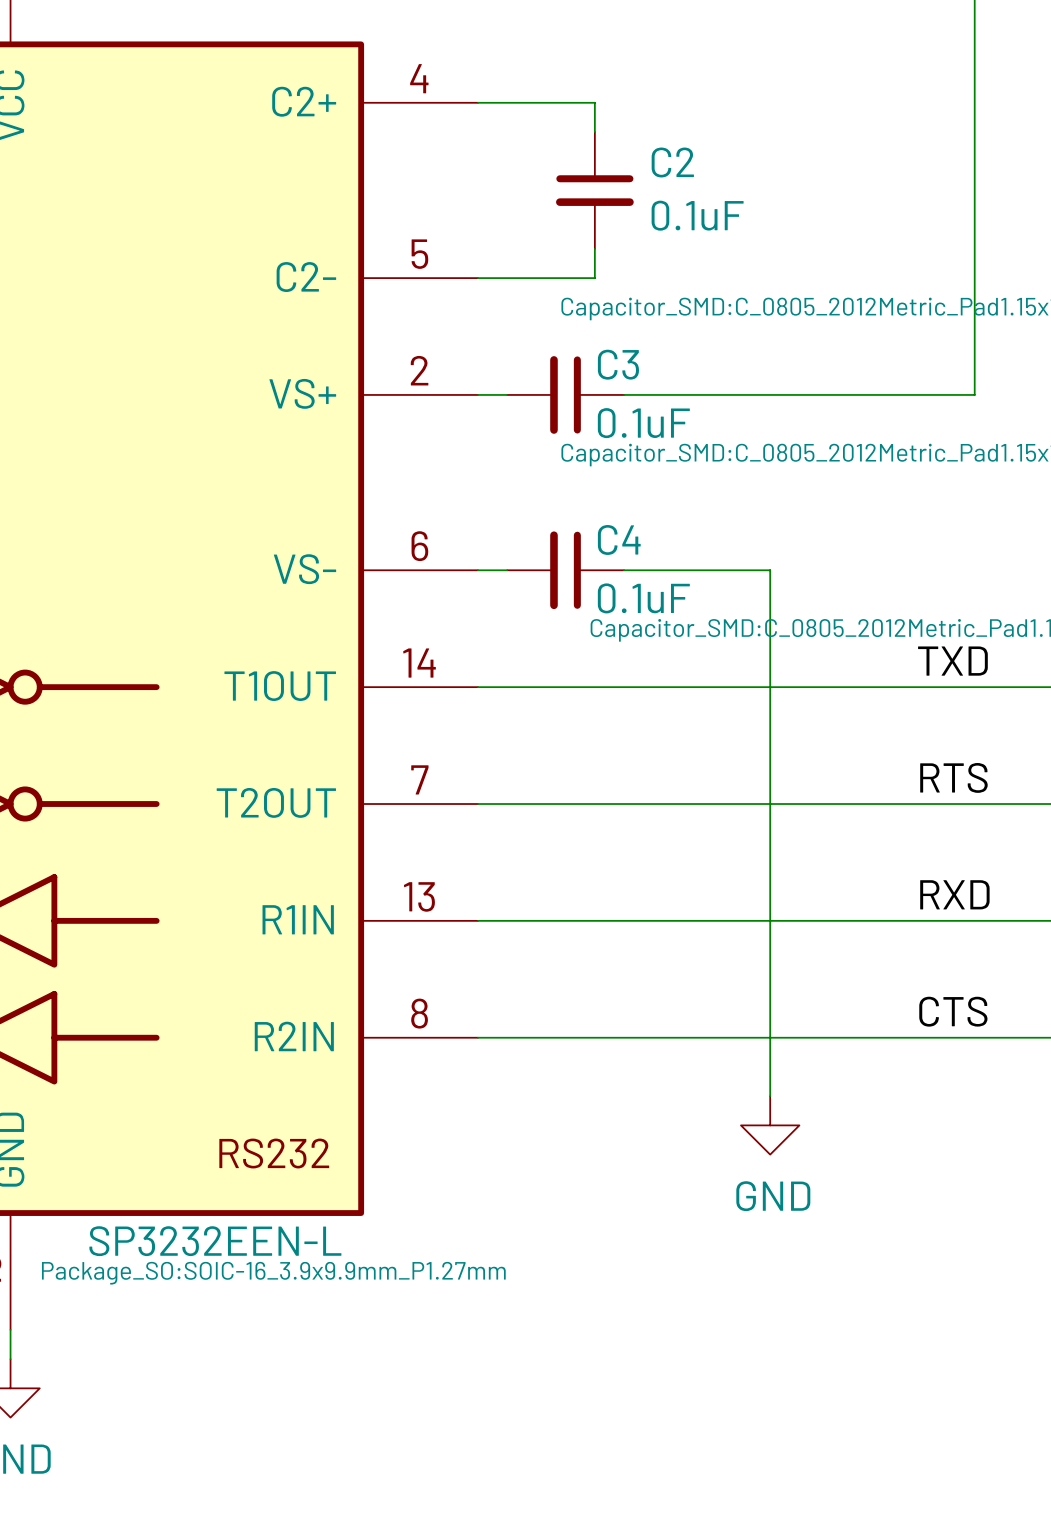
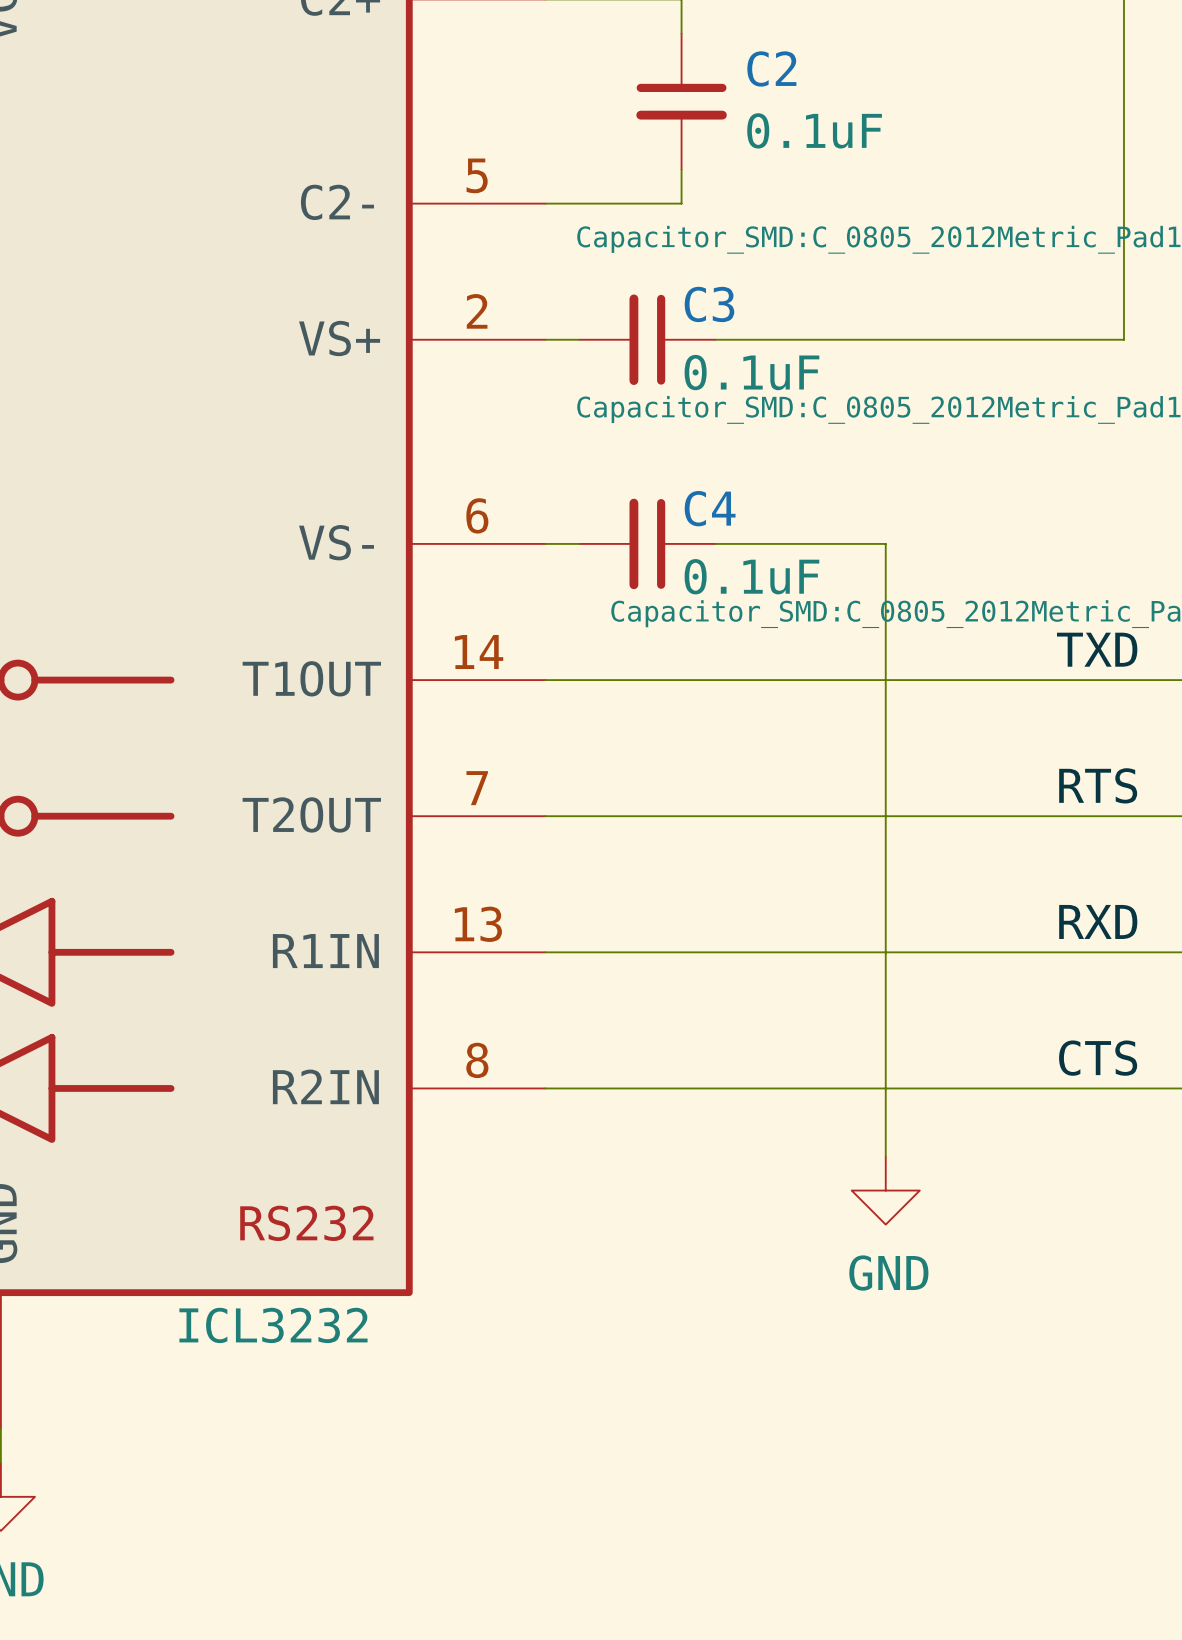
part value: SP3232EEN-L (215, 1241) -> ICL3232 (273, 1325)
part text: Package_SO:SOIC-16_3.9x9.9mm_P1.27mm (273, 1273) -> none

